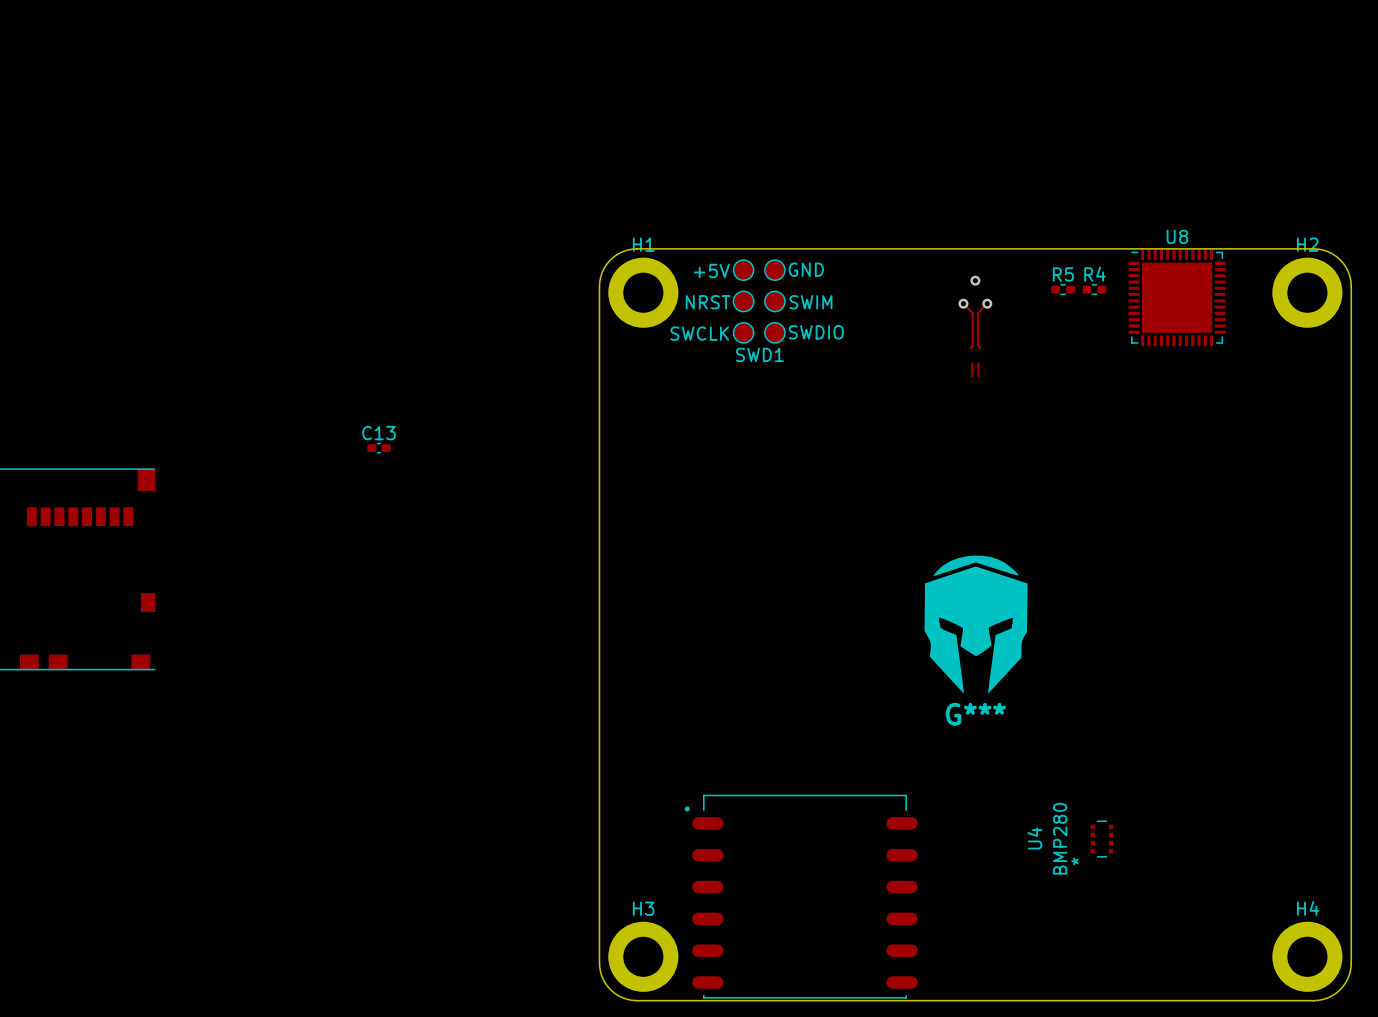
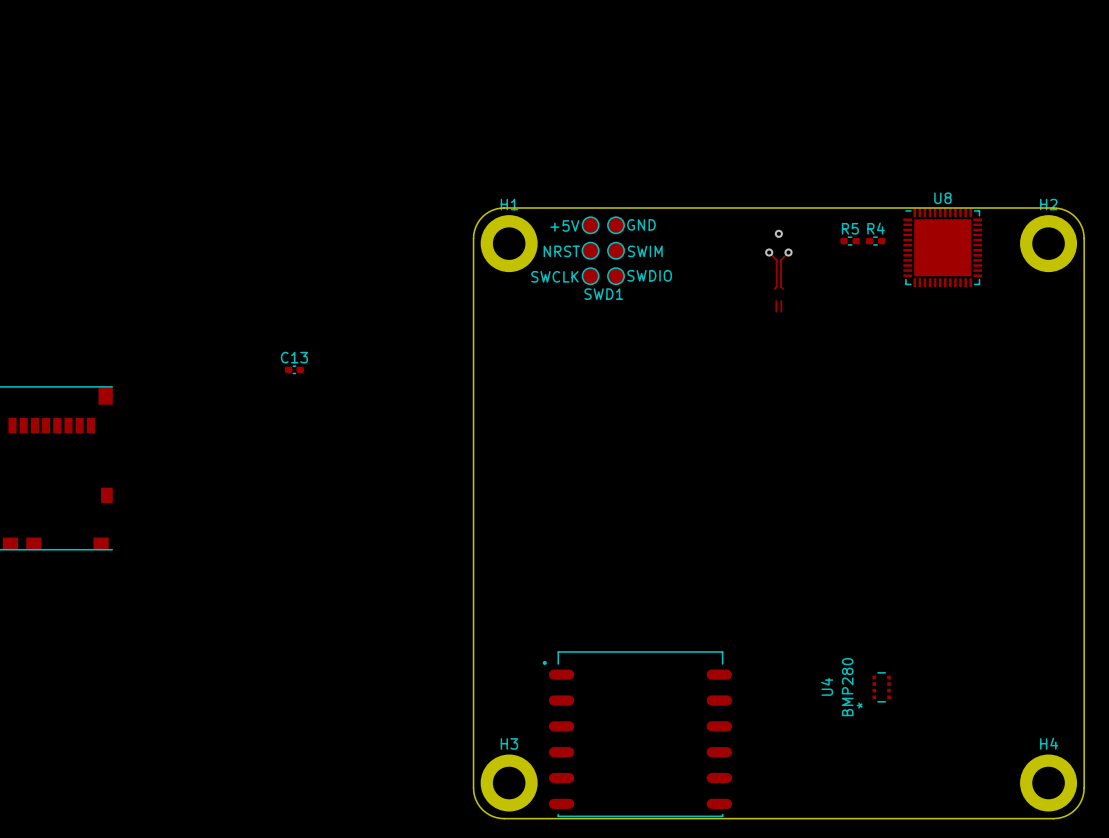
G***: (976, 624) -> none

